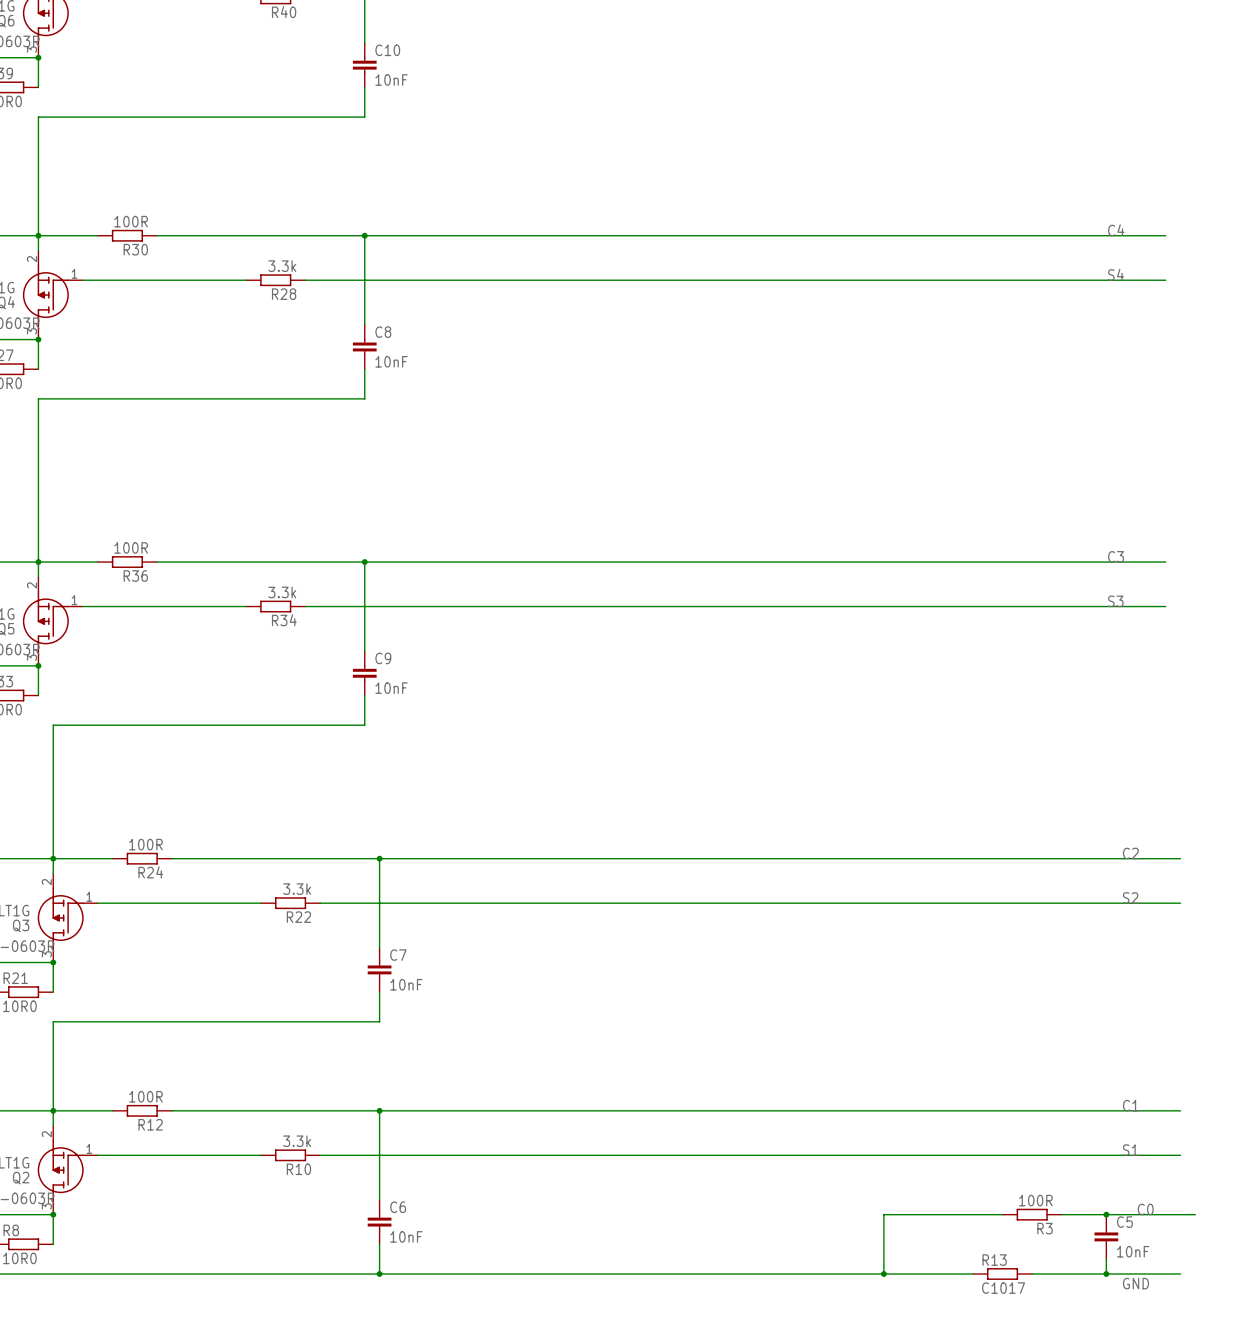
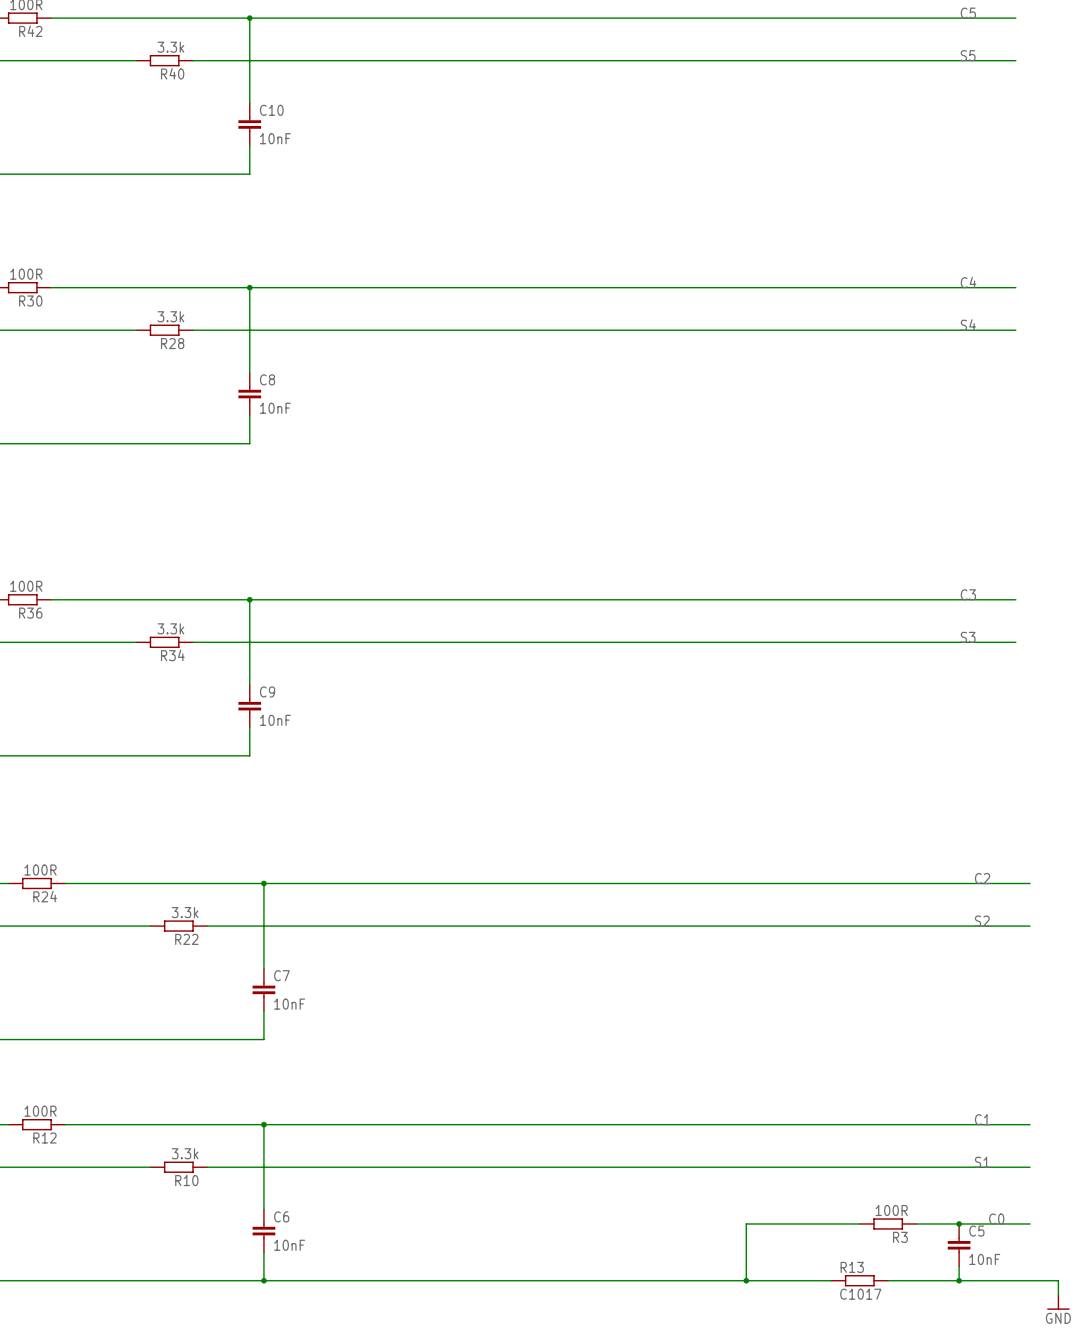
wire: (1180, 1214) (1195, 1214) -> none
wire: none -> (1030, 1280) (1058, 1280) (1058, 1294)
label: GND (1135, 1283) -> none
power symbol: none -> GND (1058, 1302)

